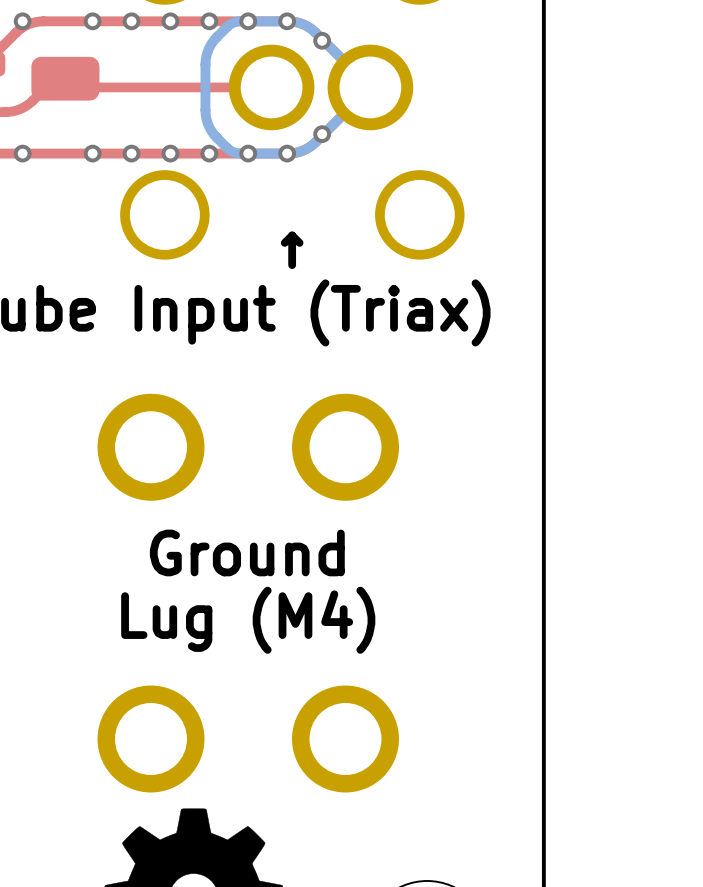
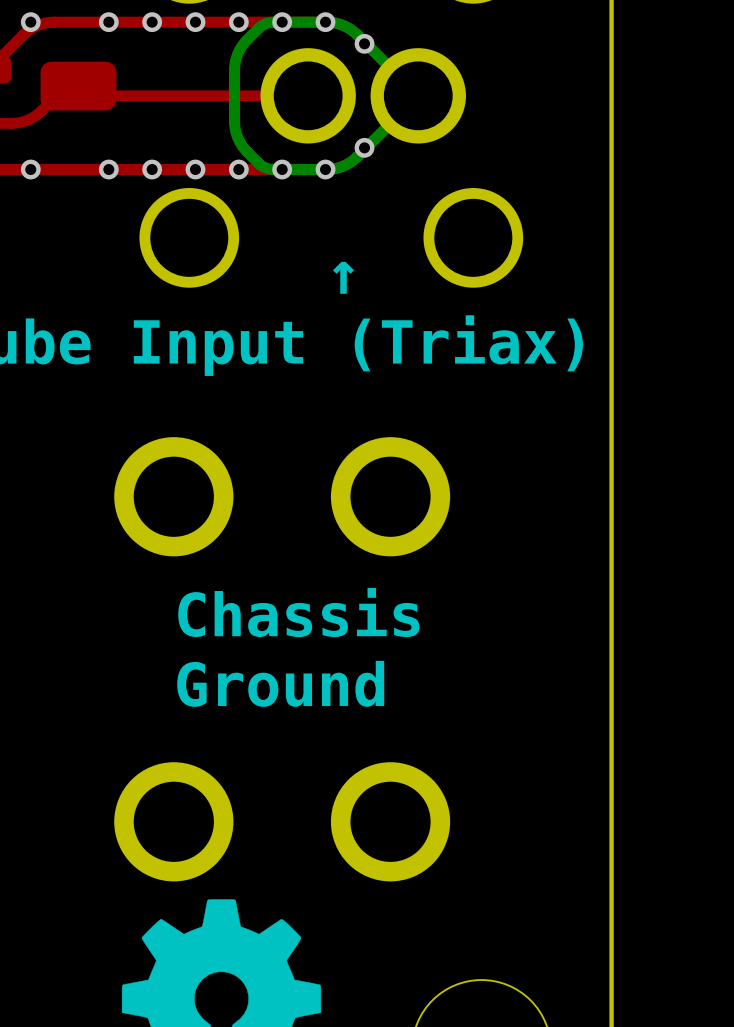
text position: Ground (247, 552) -> Ground (280, 683)
text: none -> Chassis (298, 612)
text: Lug (M4) (248, 620) -> none

